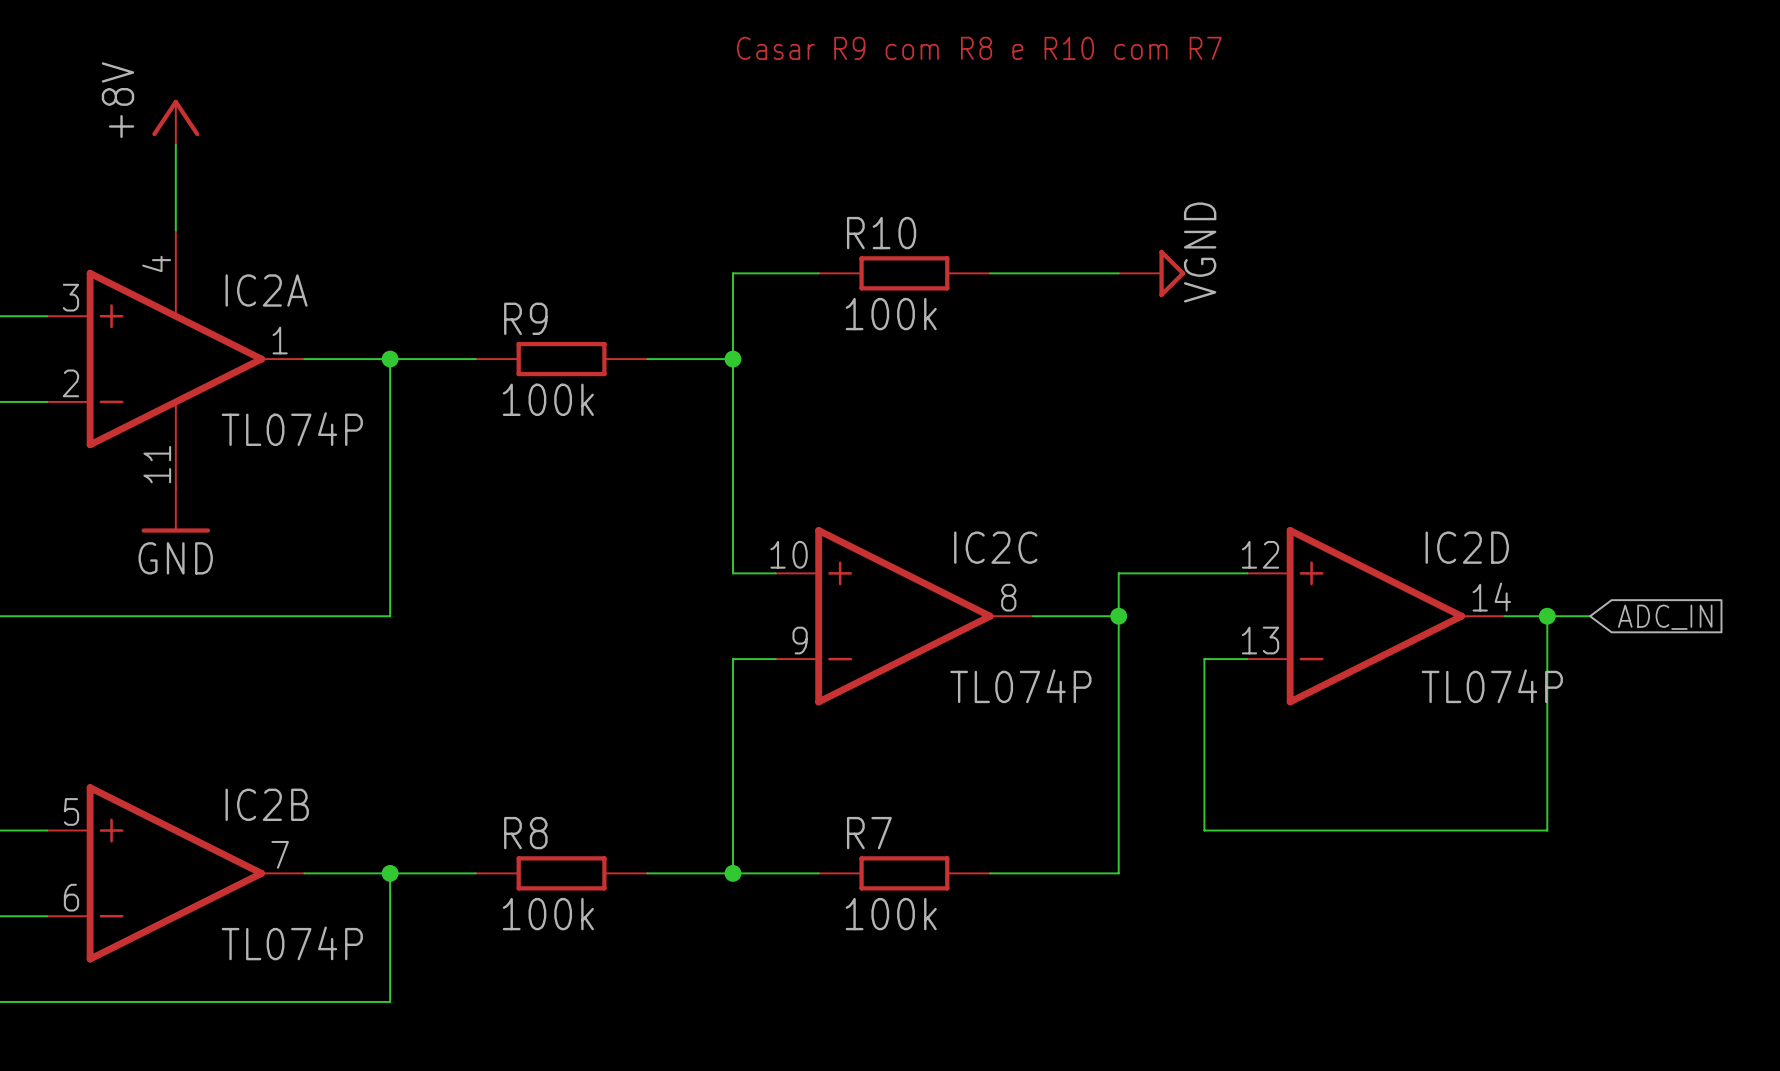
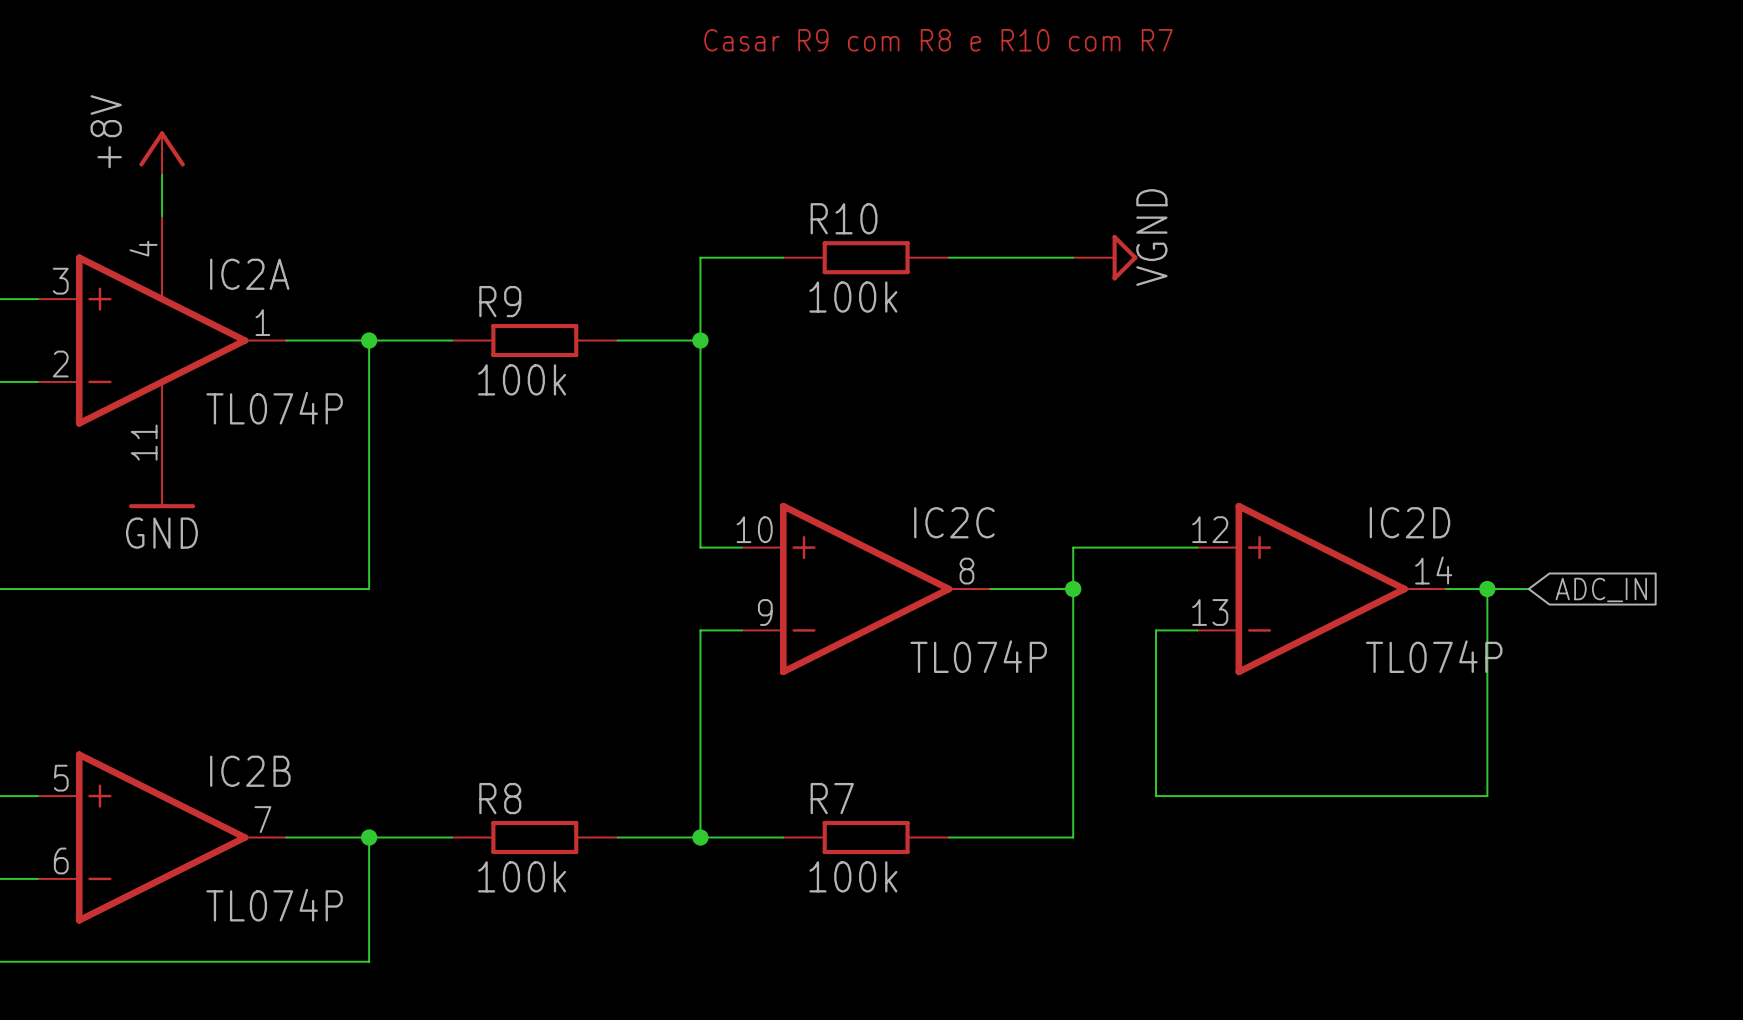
power symbol position: +8V (175, 122) -> +8V (162, 153)

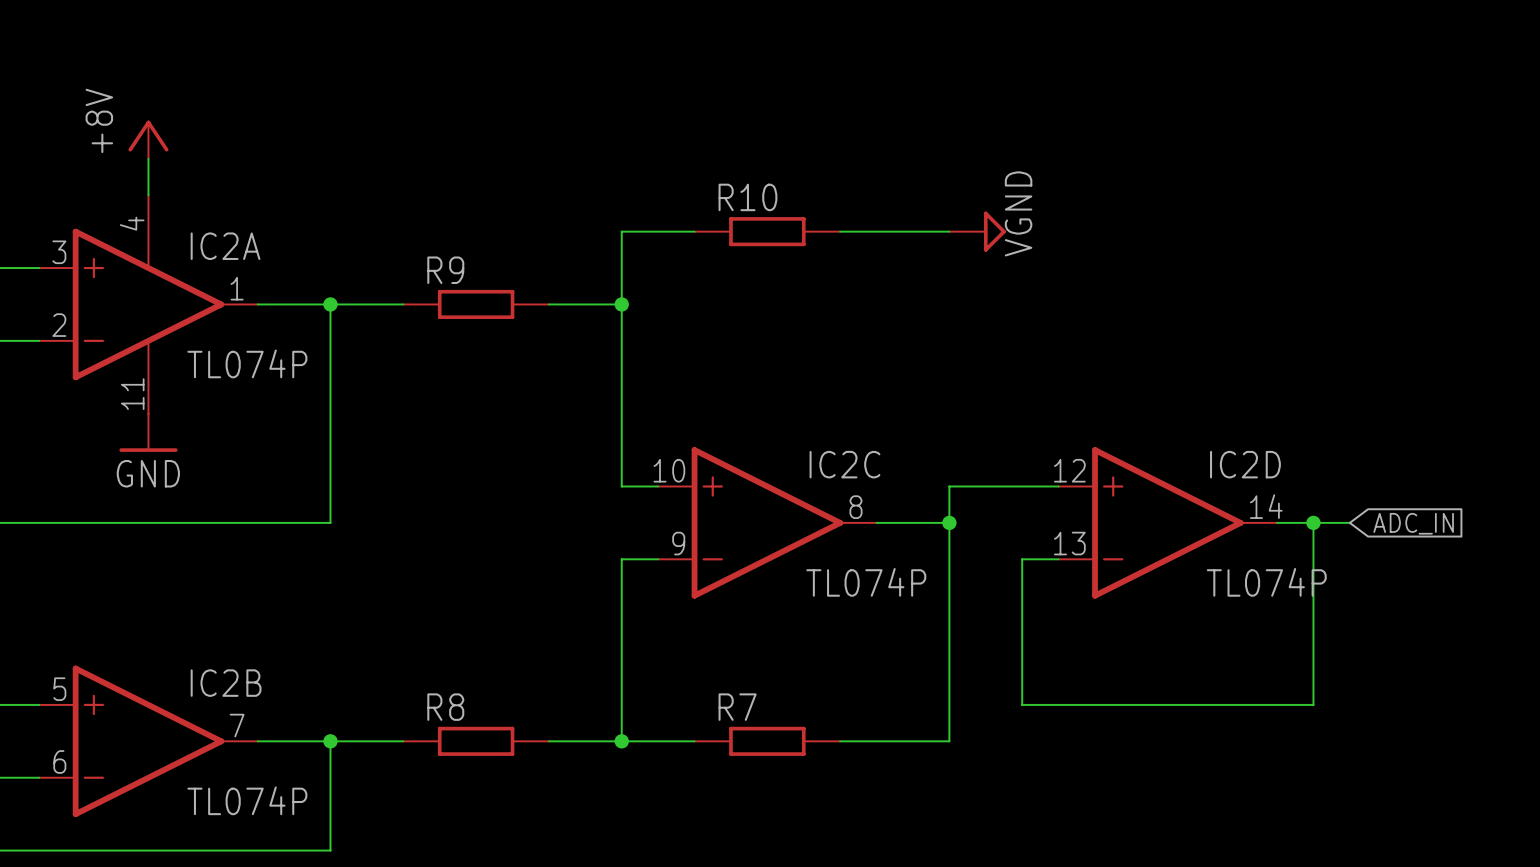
text: Casar R9 com R8 e R10 com R7 (938, 40) -> none
R10 value: 100k (853, 297) -> none
R9 value: 100k (522, 379) -> none
R8 value: 100k (522, 876) -> none
R7 value: 100k (853, 876) -> none

